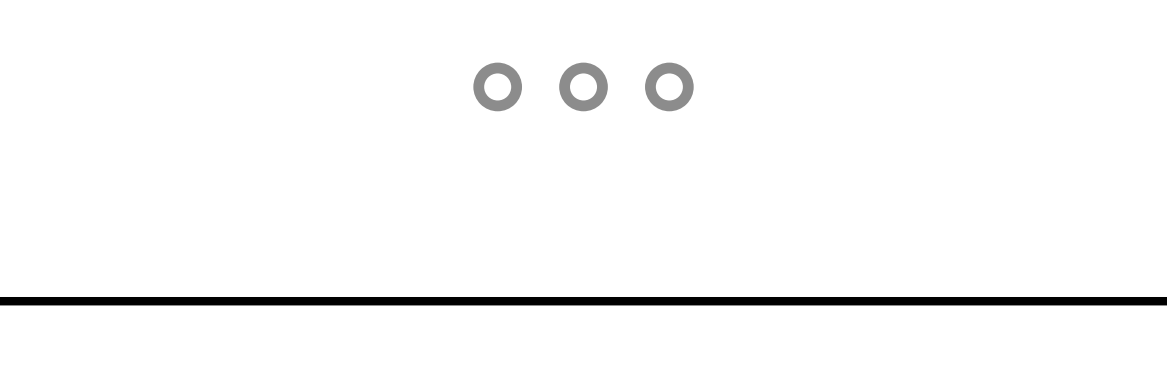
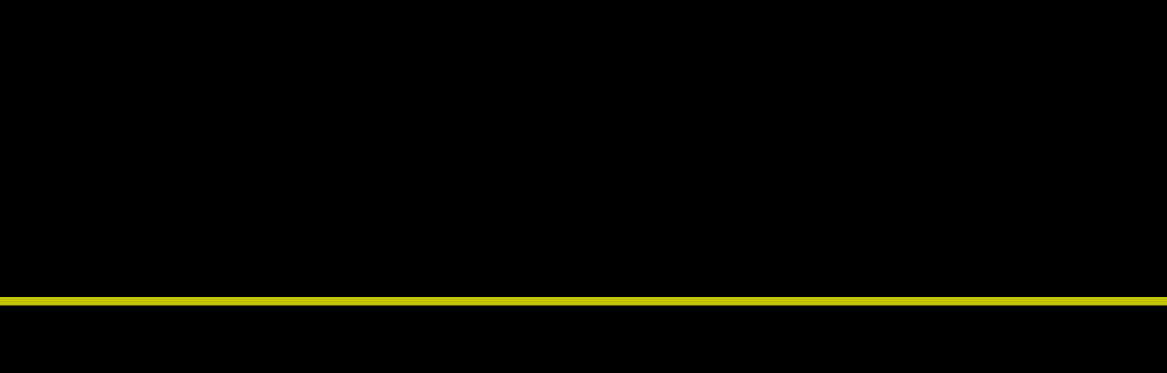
part: (583, 86) -> none

